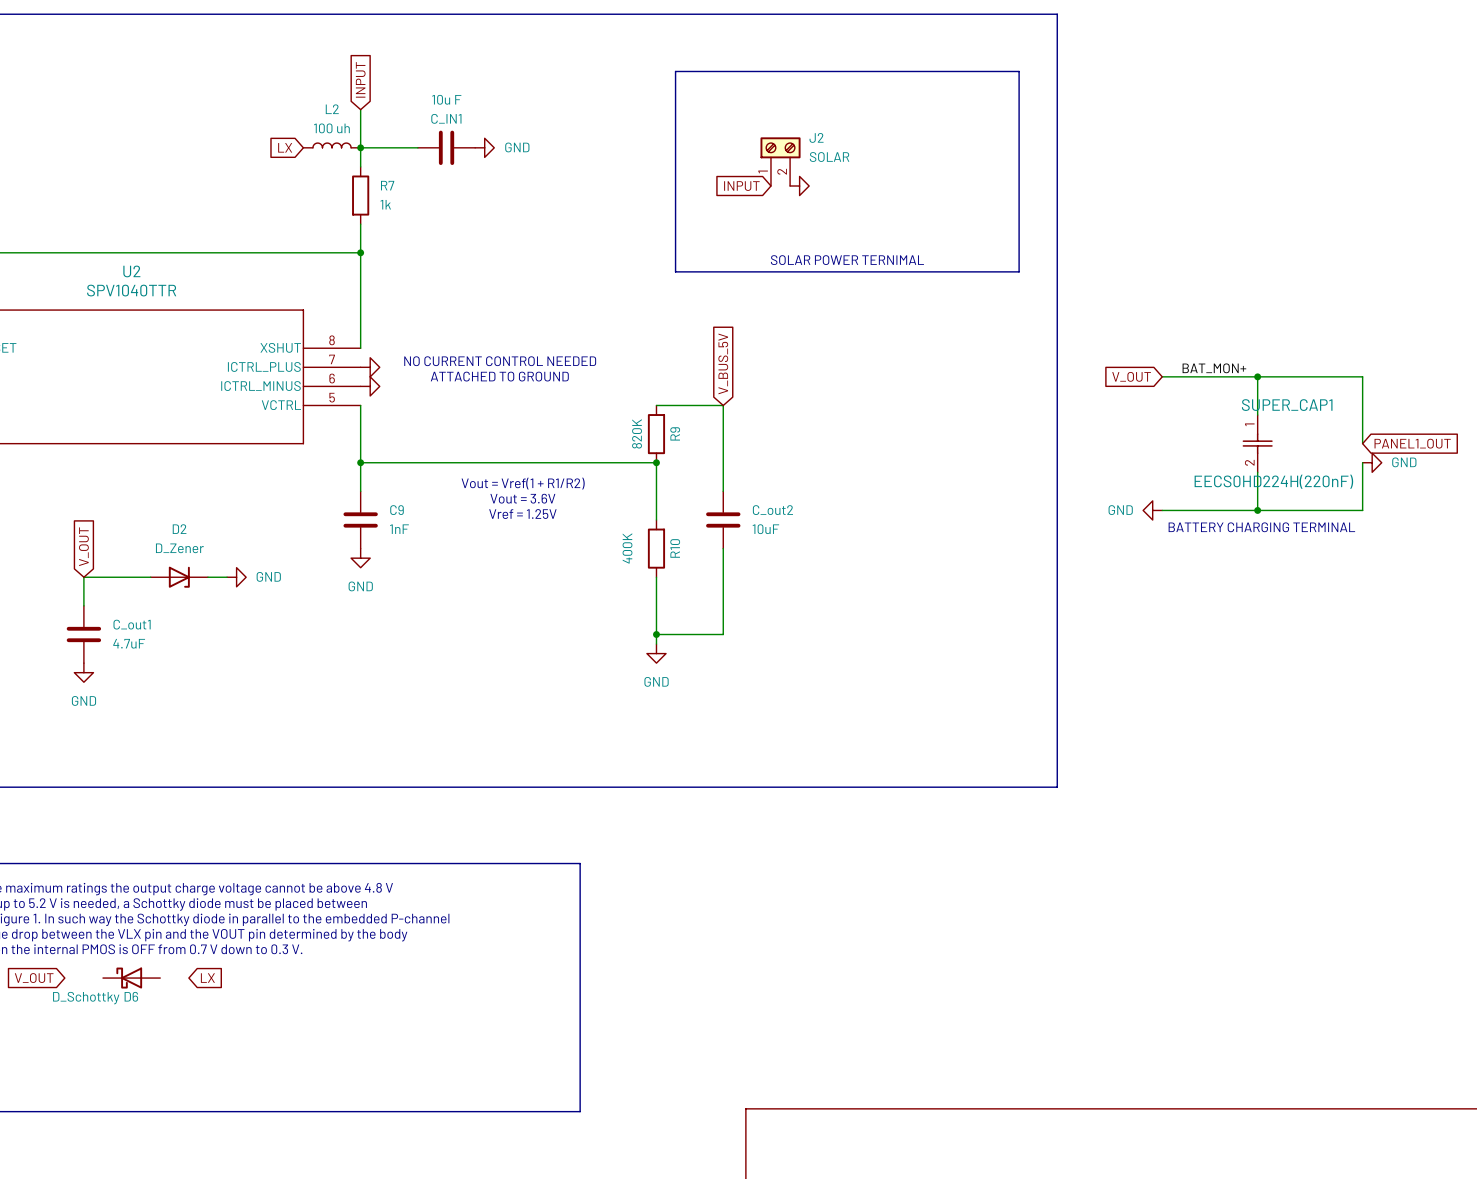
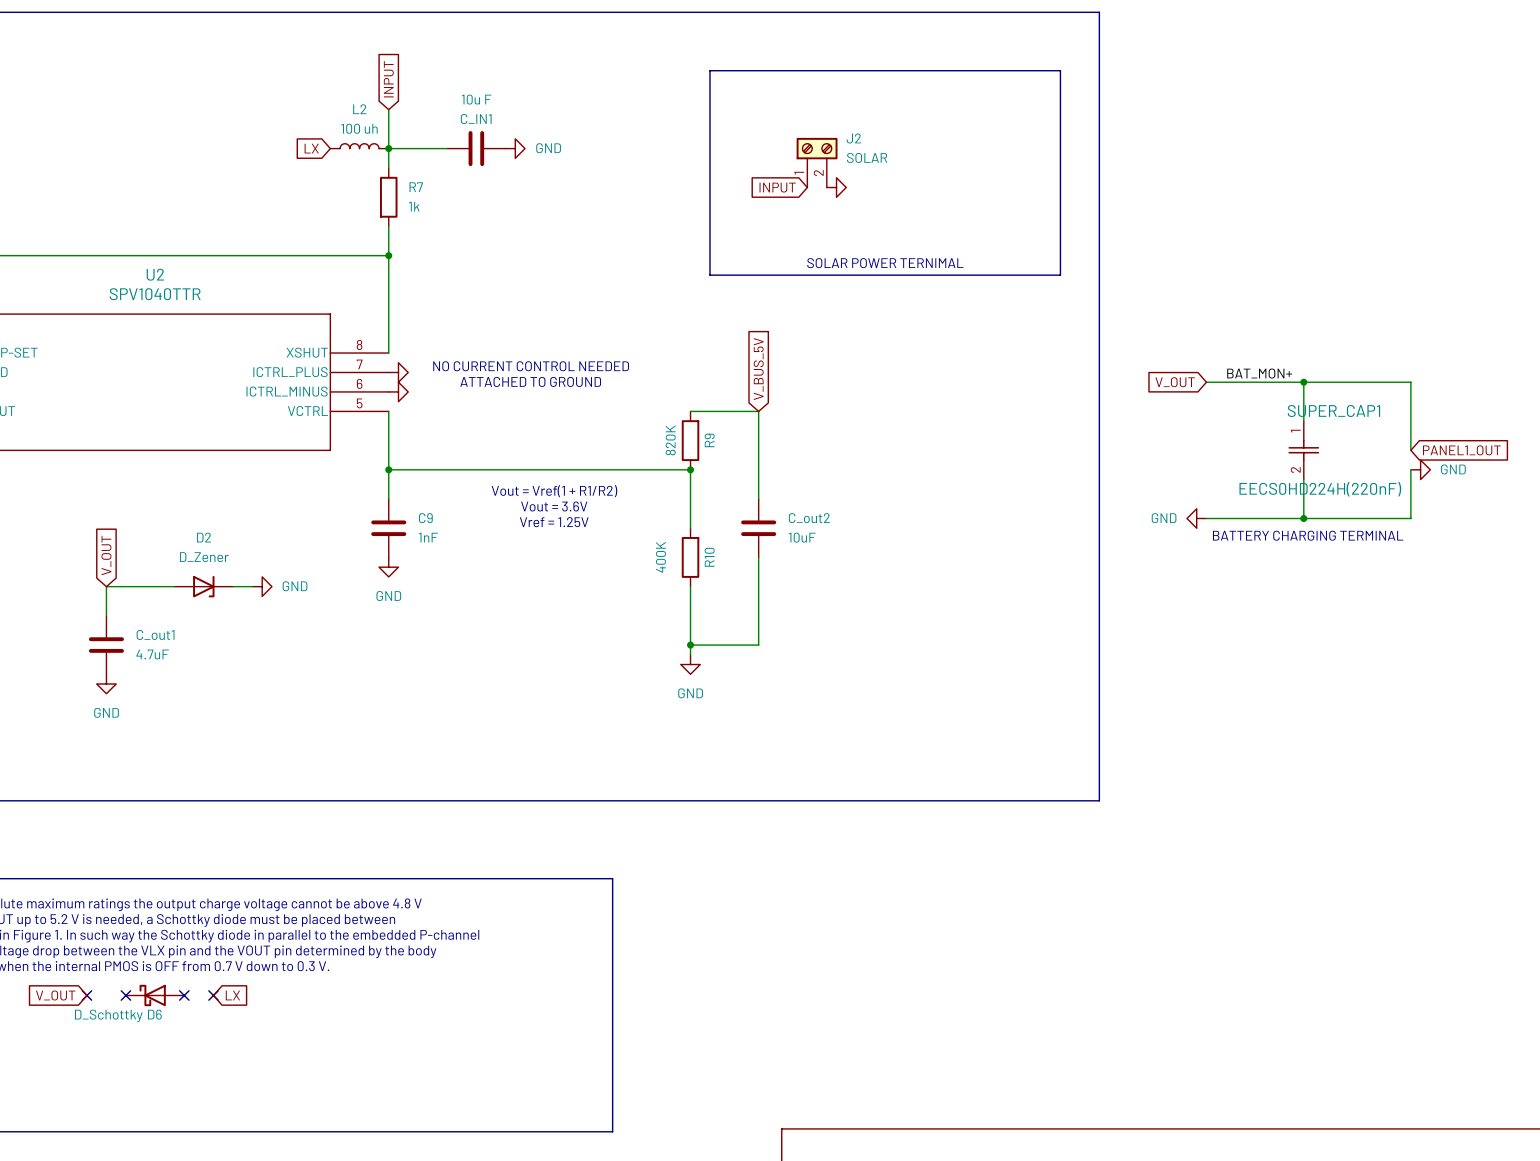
no-connect mark: none -> (86, 995)
no-connect mark: none -> (125, 995)
no-connect mark: none -> (184, 995)
no-connect mark: none -> (213, 995)

